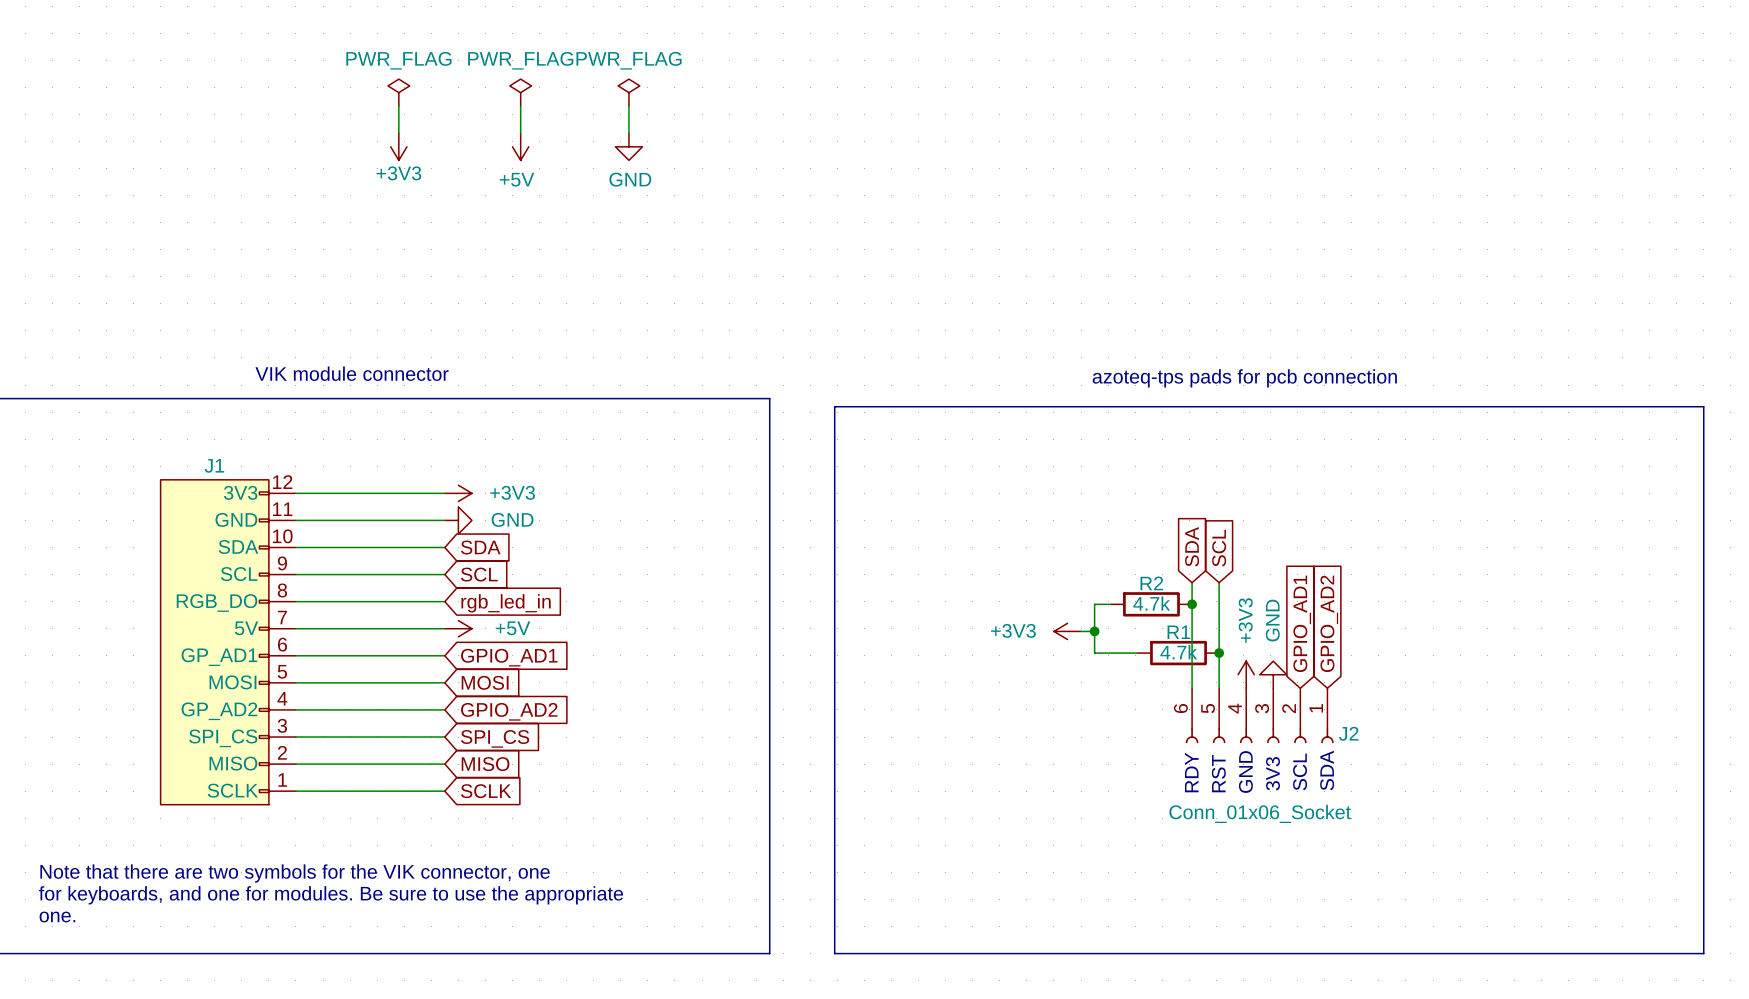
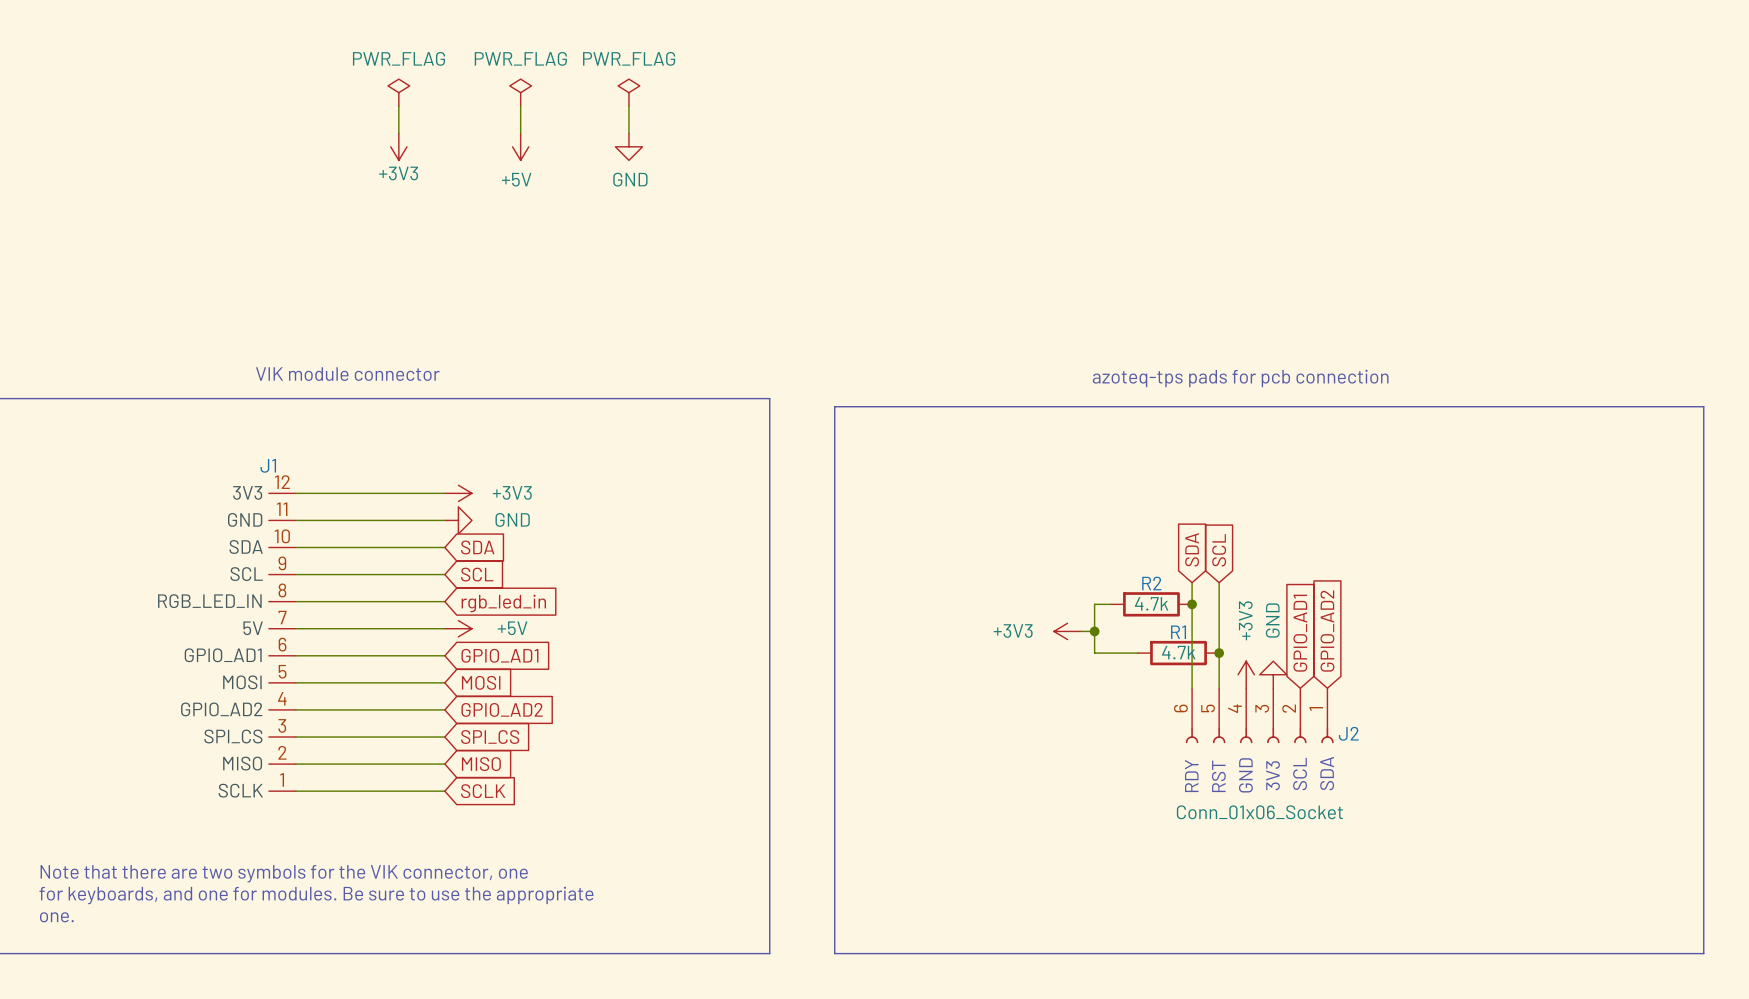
J1 symbol: [160, 479, 296, 805] -> [268, 493, 296, 792]

